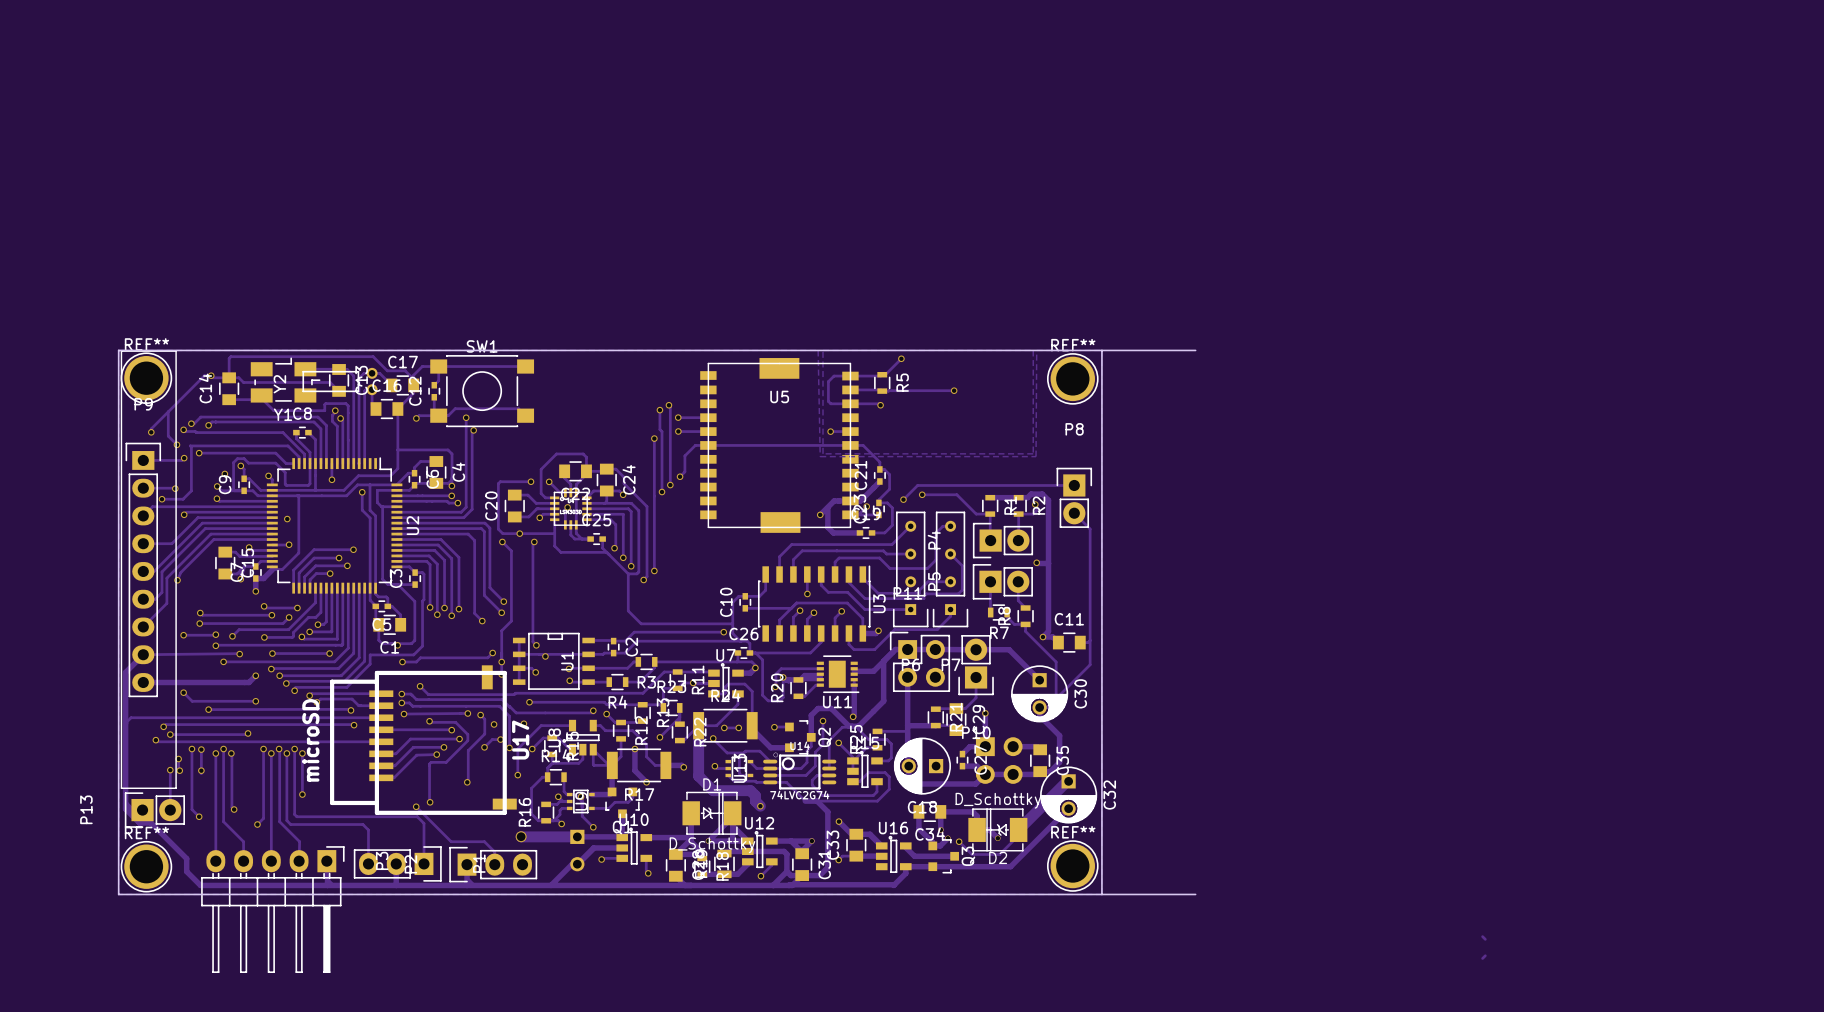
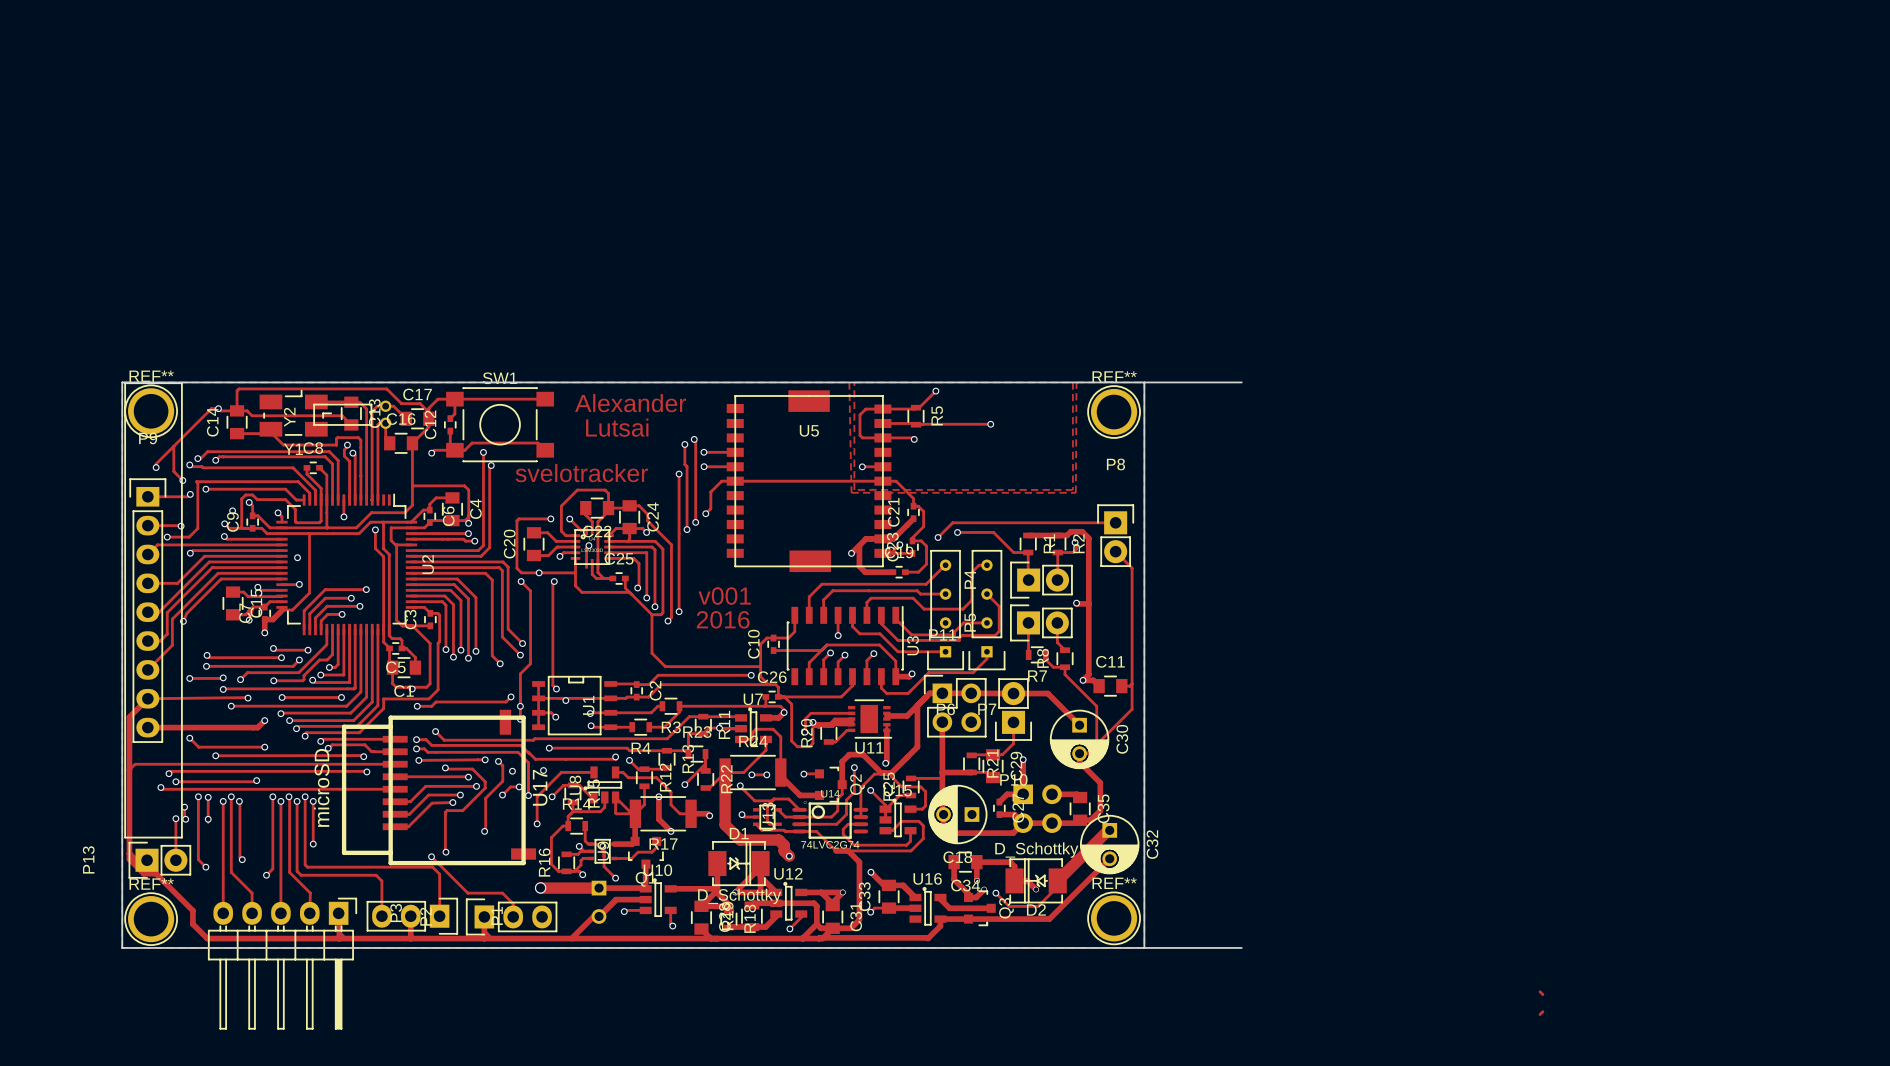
text: none -> Alexander (630, 403)
text: none -> Lutsai (617, 427)
text: none -> svelotracker (581, 473)
text: none -> v001 (724, 596)
text: none -> 2016 (723, 619)

